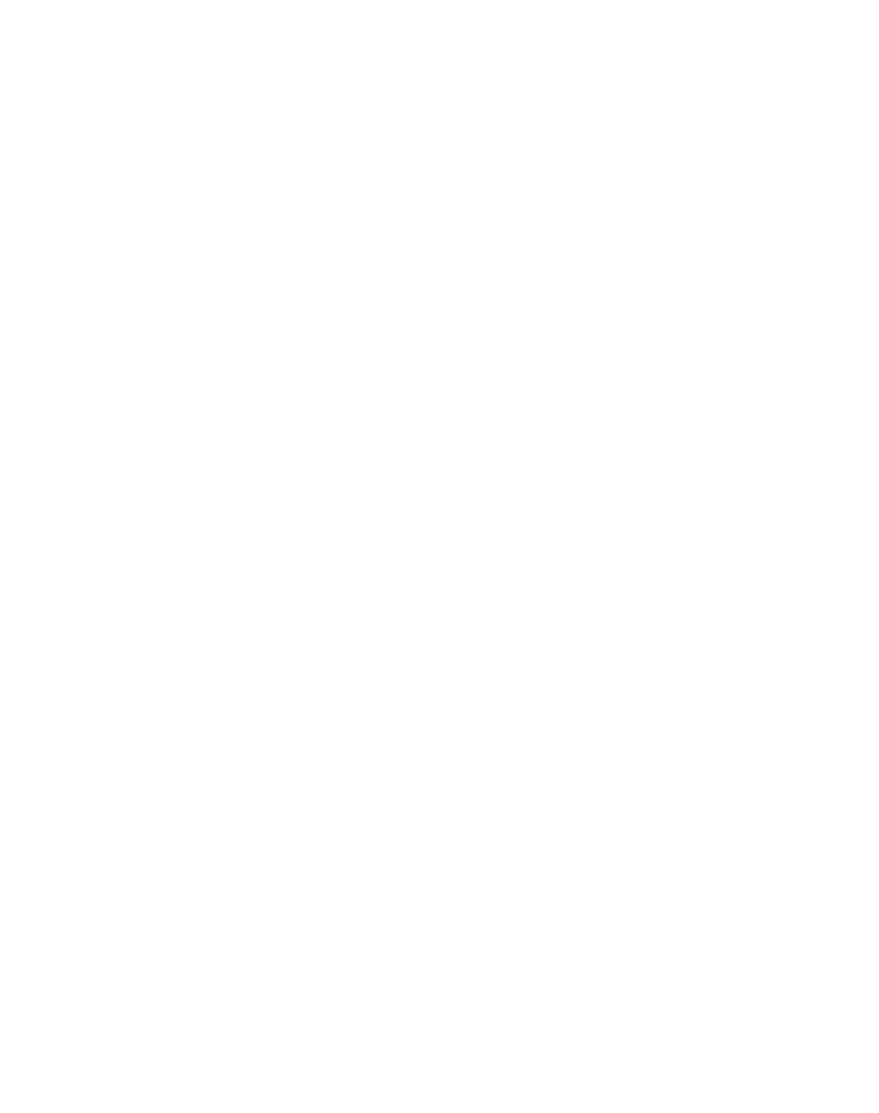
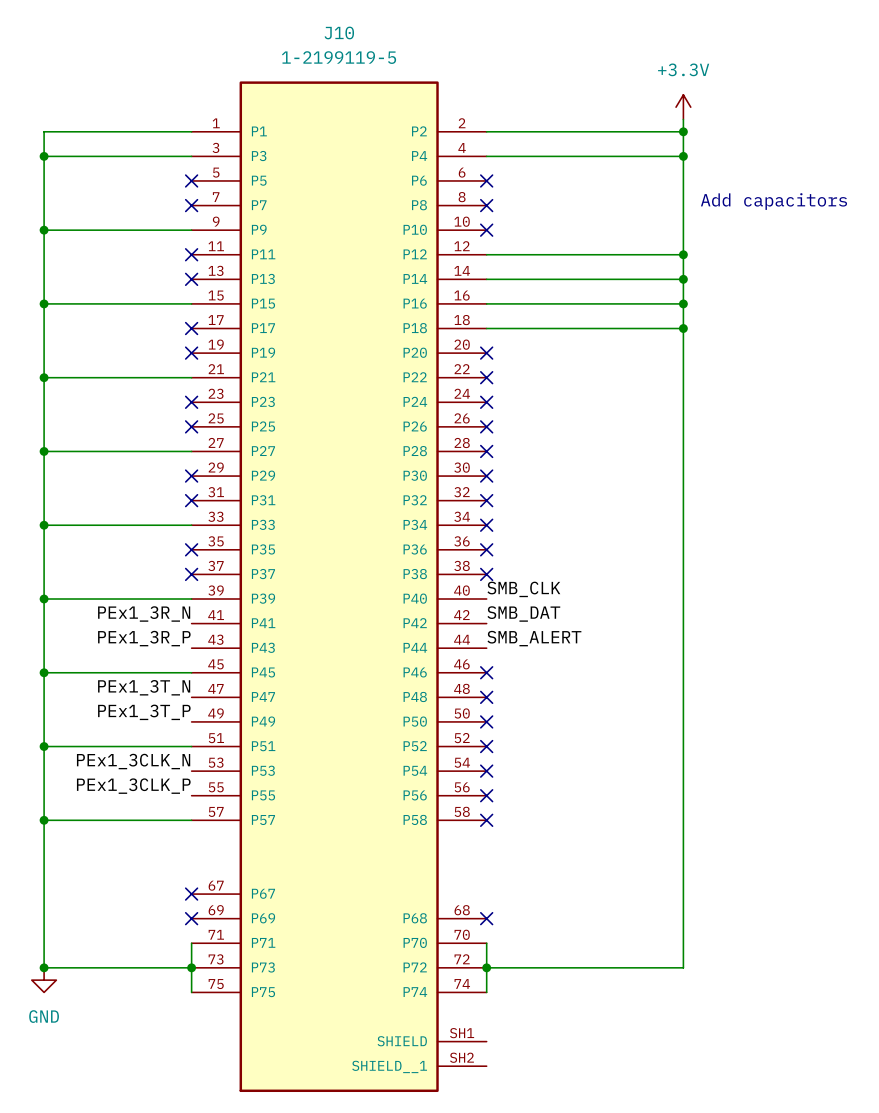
power symbol: none -> +3.3V (683, 107)
wire: none -> (683, 119) (683, 967) (486, 967)
wire: none -> (191, 131) (44, 131) (44, 967) (191, 967)
wire: none -> (486, 131) (683, 131)
junction: none -> (683, 131)
wire: none -> (44, 156) (191, 156)
junction: none -> (44, 156)
wire: none -> (486, 156) (683, 156)
junction: none -> (683, 156)
no-connect mark: none -> (191, 180)
no-connect mark: none -> (486, 180)
text: none -> Add capacitors (773, 201)
no-connect mark: none -> (191, 205)
no-connect mark: none -> (486, 205)
wire: none -> (44, 230) (191, 230)
junction: none -> (44, 230)
no-connect mark: none -> (486, 230)
no-connect mark: none -> (191, 254)
wire: none -> (486, 254) (683, 254)
junction: none -> (683, 254)
no-connect mark: none -> (191, 279)
wire: none -> (486, 279) (683, 279)
junction: none -> (683, 279)
wire: none -> (44, 303) (191, 303)
junction: none -> (44, 303)
wire: none -> (486, 303) (683, 303)
junction: none -> (683, 303)
no-connect mark: none -> (191, 328)
wire: none -> (486, 328) (683, 328)
junction: none -> (683, 328)
no-connect mark: none -> (191, 353)
no-connect mark: none -> (486, 353)
wire: none -> (44, 377) (191, 377)
junction: none -> (44, 377)
no-connect mark: none -> (486, 377)
no-connect mark: none -> (191, 402)
no-connect mark: none -> (486, 402)
no-connect mark: none -> (191, 426)
no-connect mark: none -> (486, 426)
wire: none -> (44, 451) (191, 451)
junction: none -> (44, 451)
no-connect mark: none -> (486, 451)
no-connect mark: none -> (191, 476)
no-connect mark: none -> (486, 476)
no-connect mark: none -> (191, 500)
no-connect mark: none -> (486, 500)
wire: none -> (44, 525) (191, 525)
junction: none -> (44, 525)
no-connect mark: none -> (486, 525)
no-connect mark: none -> (191, 549)
no-connect mark: none -> (486, 549)
no-connect mark: none -> (191, 574)
no-connect mark: none -> (486, 574)
J10: none -> 1-2199119-5 (339, 586)
label: none -> SMB_CLK (523, 589)
wire: none -> (44, 599) (191, 599)
junction: none -> (44, 599)
label: none -> PEx1_3R_N (144, 614)
label: none -> SMB_DAT (523, 614)
label: none -> PEx1_3R_P (144, 638)
label: none -> SMB_ALERT (534, 638)
wire: none -> (44, 672) (191, 672)
junction: none -> (44, 672)
no-connect mark: none -> (486, 672)
label: none -> PEx1_3T_N (144, 687)
no-connect mark: none -> (486, 697)
label: none -> PEx1_3T_P (144, 712)
no-connect mark: none -> (486, 721)
wire: none -> (44, 746) (191, 746)
junction: none -> (44, 746)
no-connect mark: none -> (486, 746)
label: none -> PEx1_3CLK_N (133, 761)
no-connect mark: none -> (486, 771)
label: none -> PEx1_3CLK_P (133, 786)
no-connect mark: none -> (486, 795)
wire: none -> (44, 820) (191, 820)
junction: none -> (44, 820)
no-connect mark: none -> (486, 820)
no-connect mark: none -> (191, 894)
no-connect mark: none -> (191, 918)
no-connect mark: none -> (486, 918)
wire: none -> (191, 943) (191, 992)
wire: none -> (486, 943) (486, 992)
junction: none -> (44, 967)
junction: none -> (191, 967)
junction: none -> (486, 967)
power symbol: none -> GND (44, 980)

